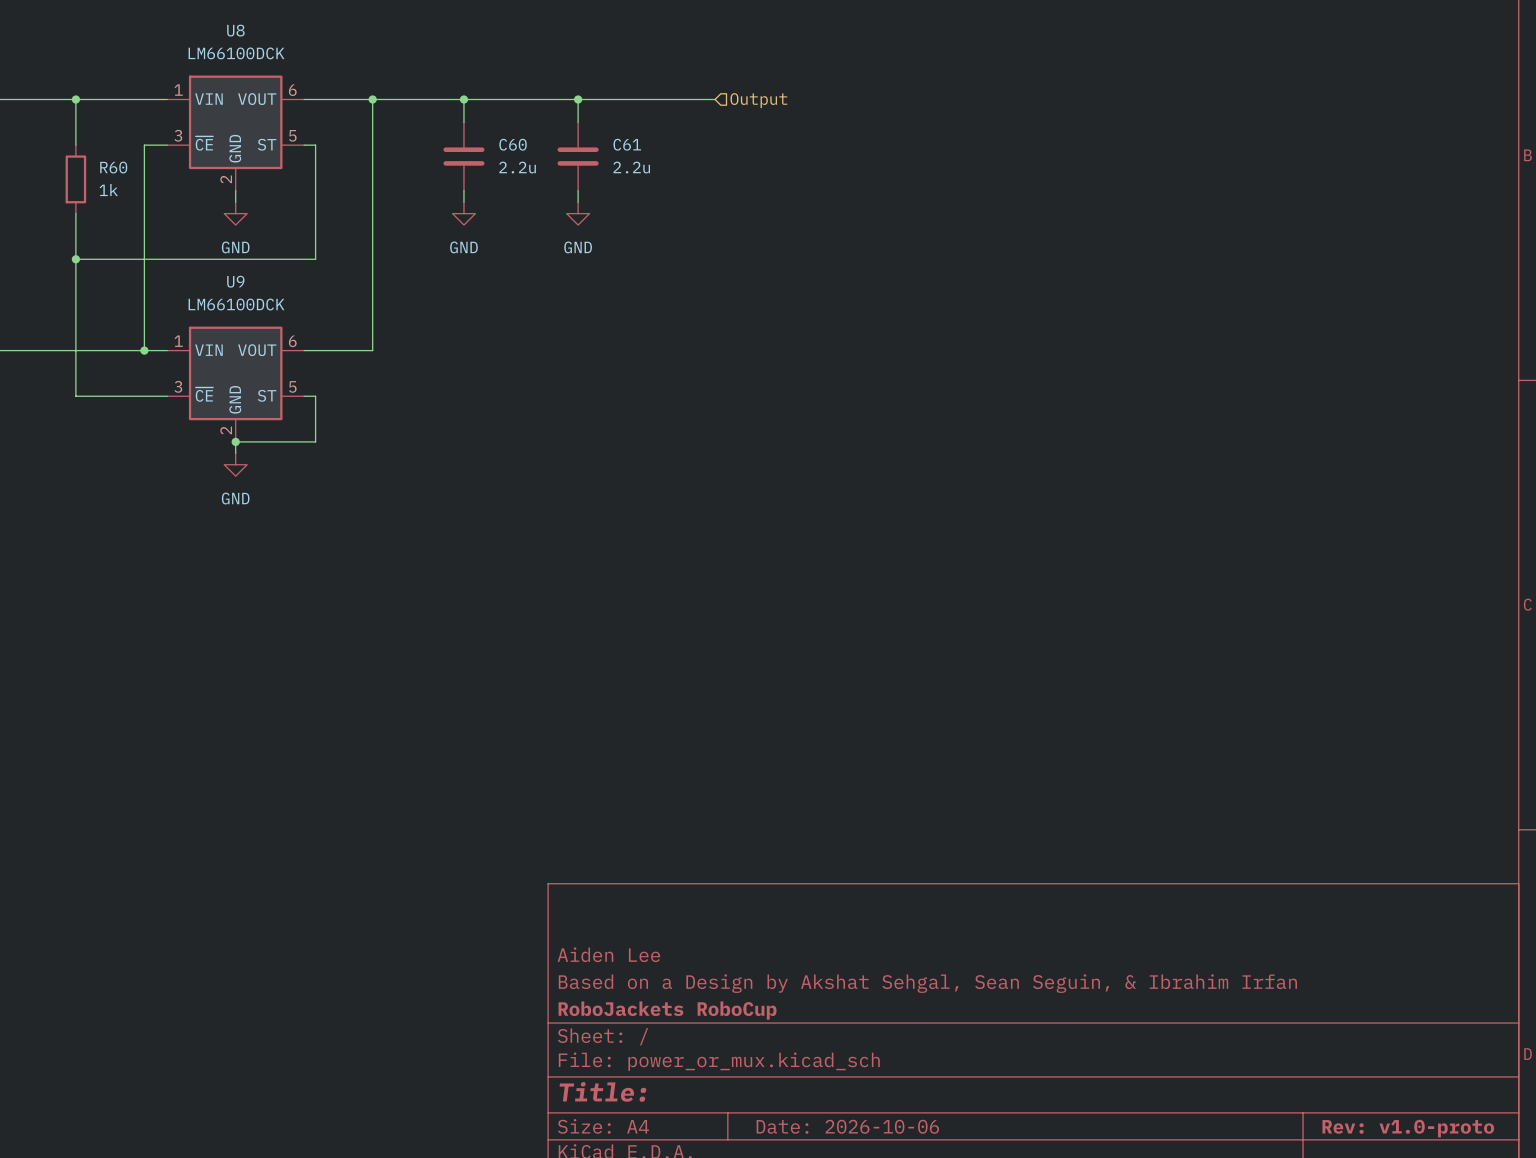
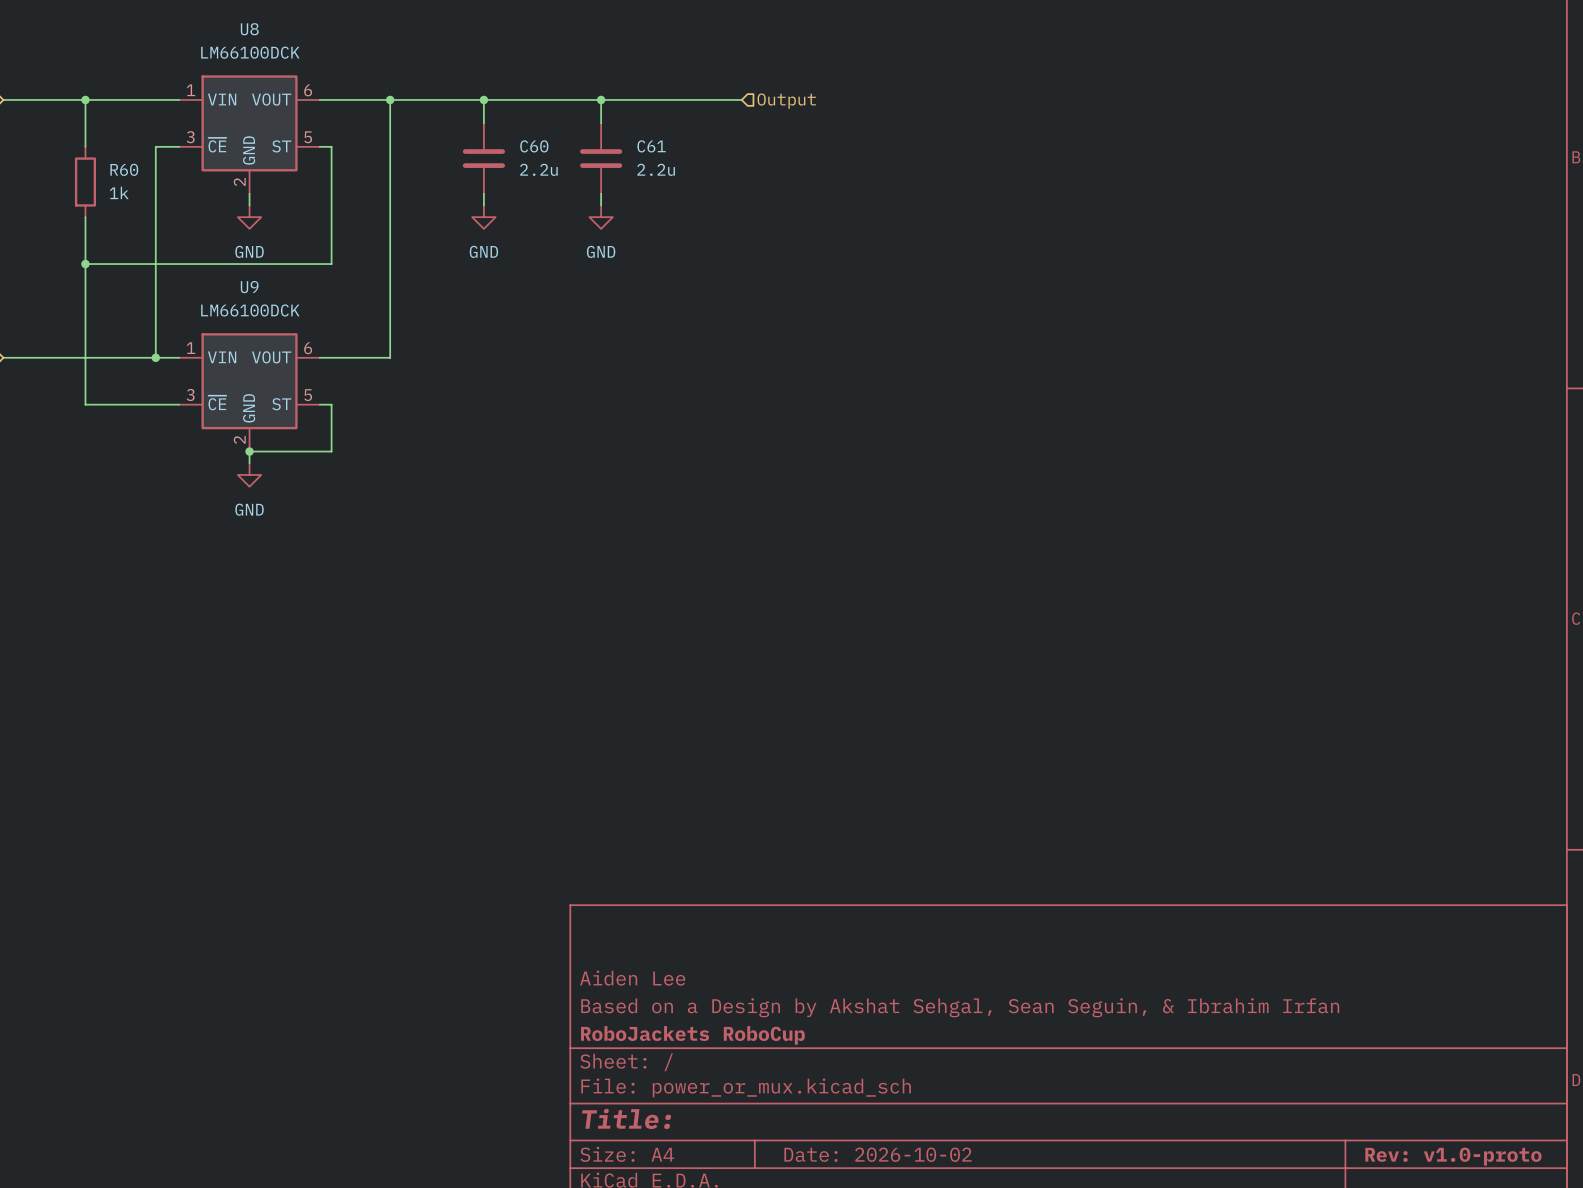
title block: Date: 2026-10-06 (847, 1126) -> Date: 2026-10-02 (878, 1154)

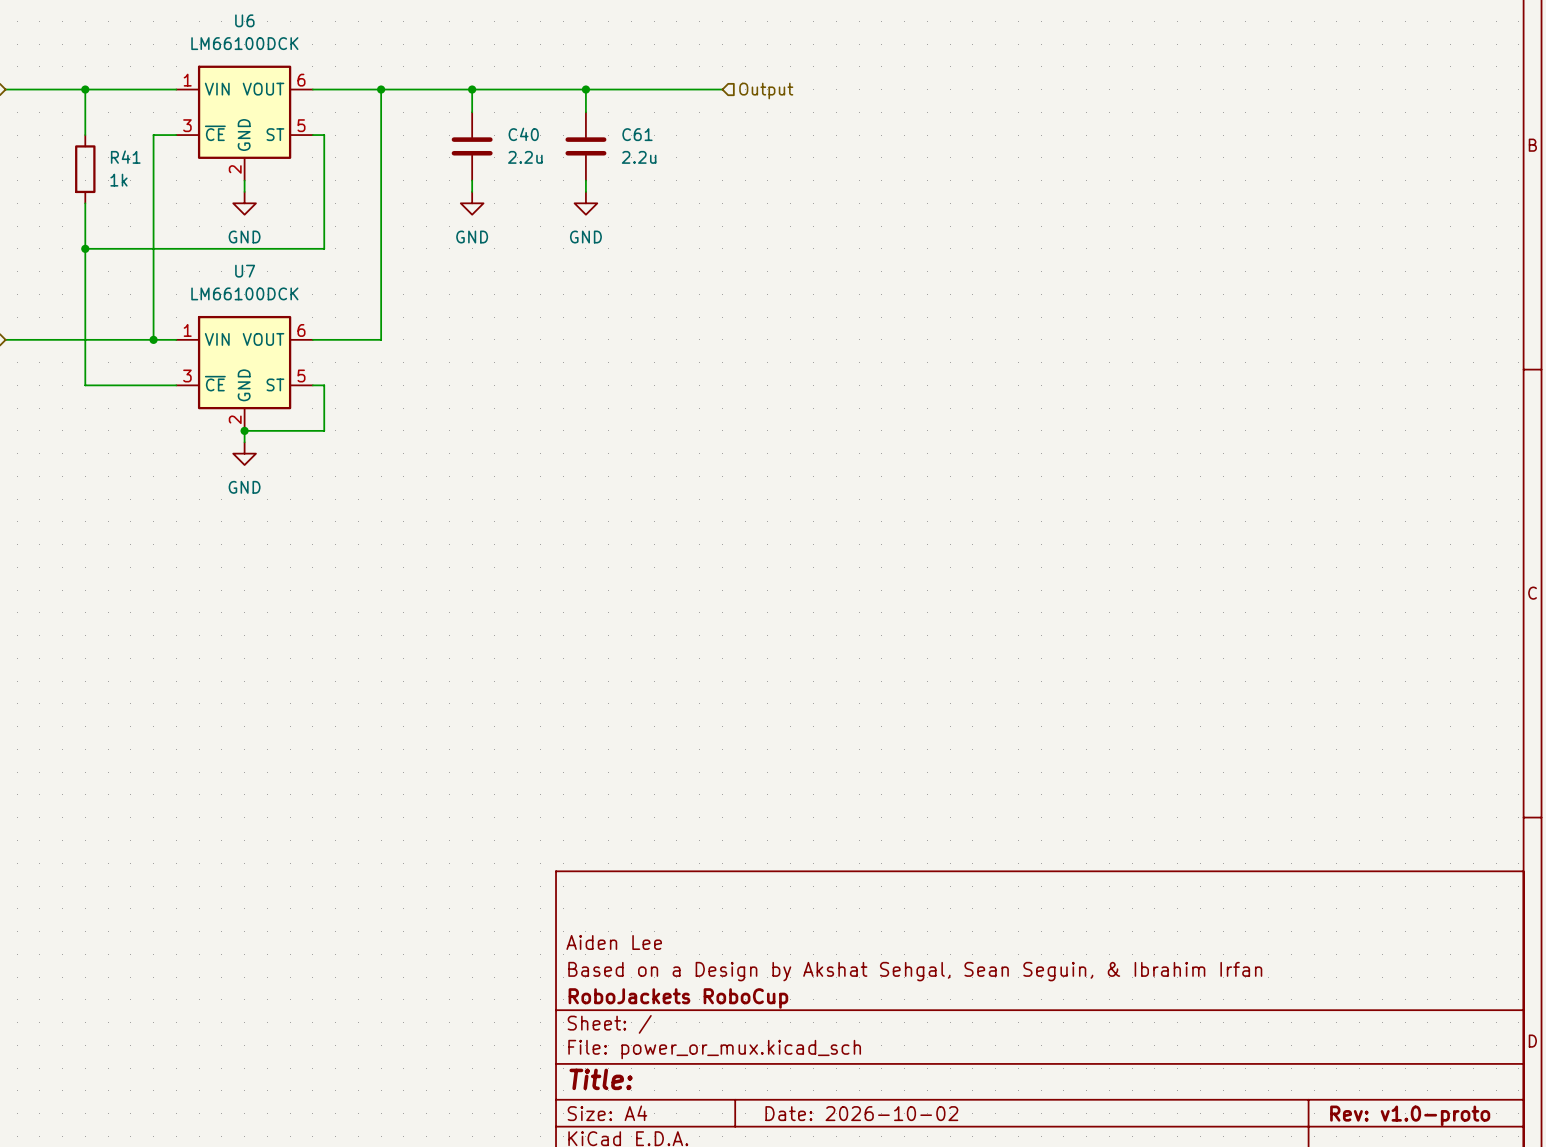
U8 name: U8 (249, 29) -> U6 (244, 20)
C60 name: C60 (534, 146) -> C40 (523, 134)
R60 name: R60 (124, 169) -> R41 (125, 157)
U9 name: U9 (249, 287) -> U7 (245, 271)

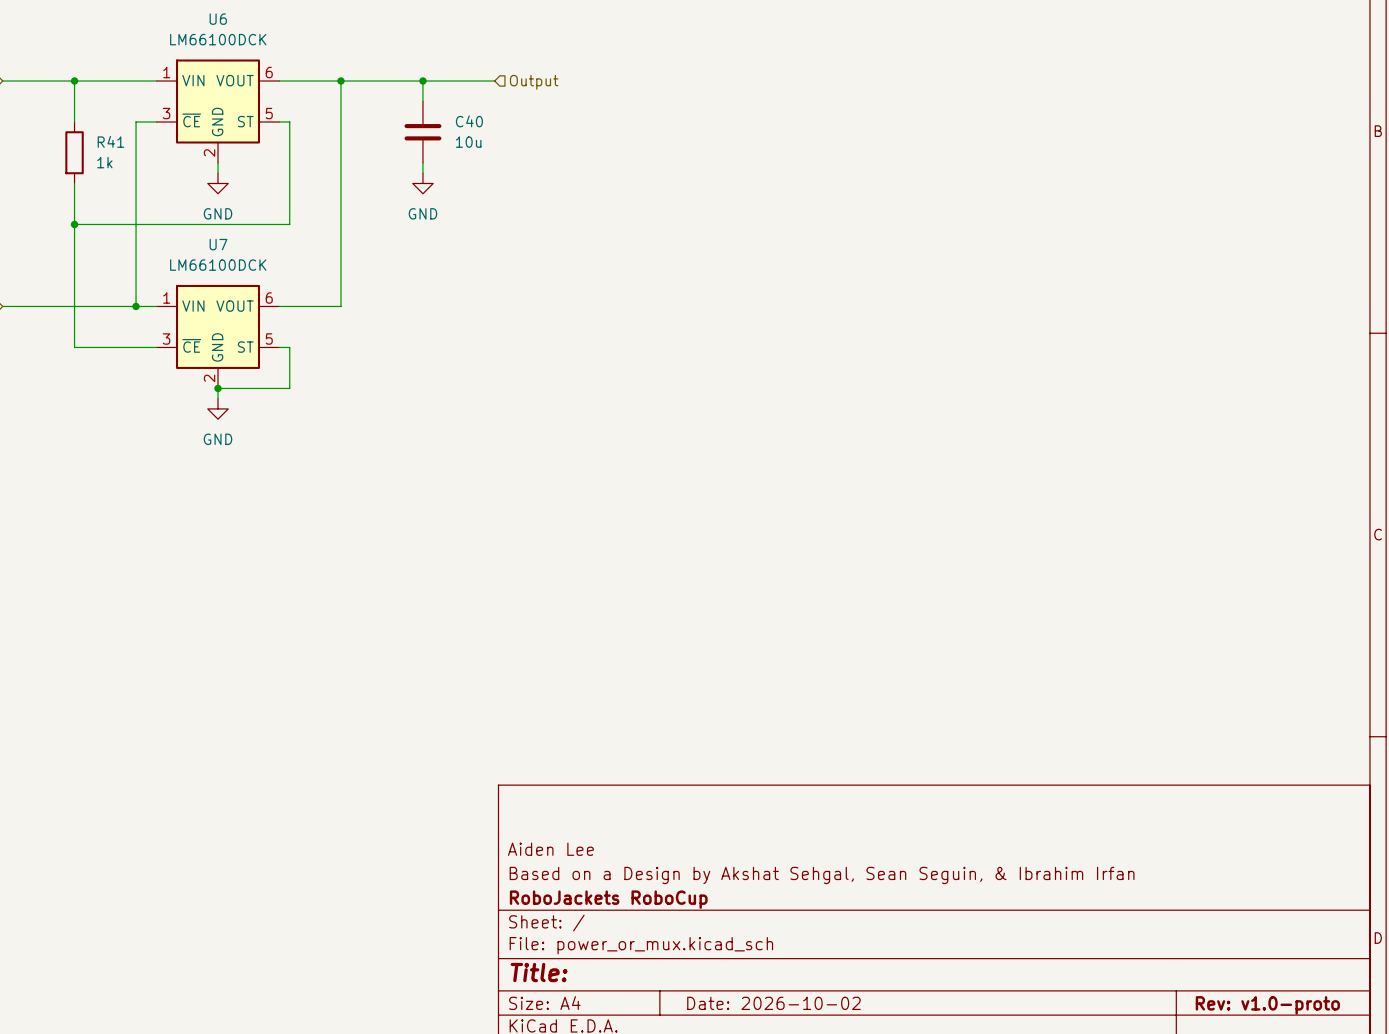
wire: (551, 89) (722, 89) -> none
wire: (585, 89) (585, 112) -> none
junction: (585, 89) -> none
hierarchical label position: Output (766, 91) -> Output (534, 82)
C61: 2.2u (585, 146) -> none
C40 value: 2.2u (525, 157) -> 10u (468, 142)
wire: (585, 180) (585, 191) -> none
power symbol: GND (585, 203) -> none

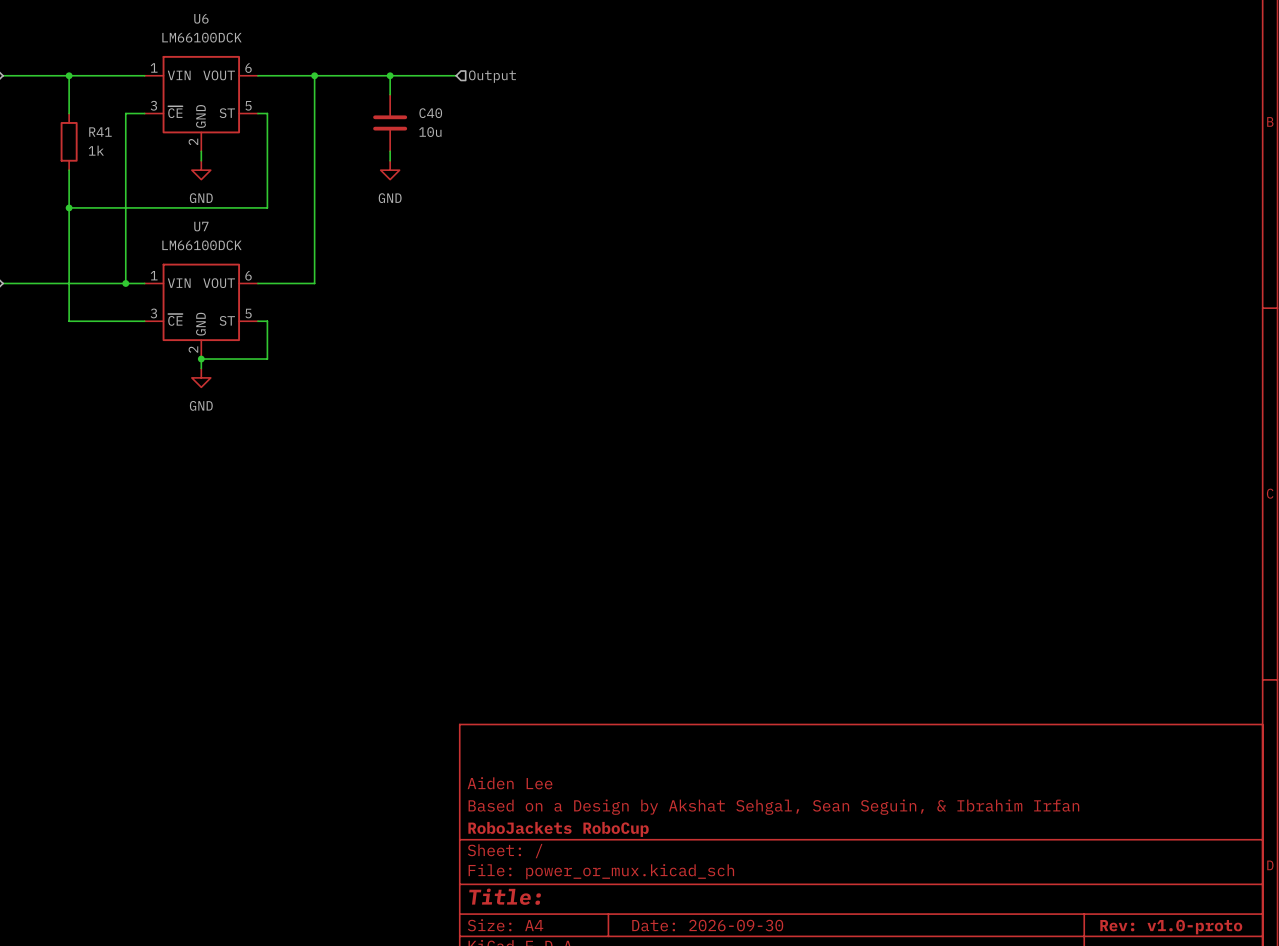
title block: Date: 2026-10-02 (773, 1003) -> Date: 2026-09-30 (707, 925)

